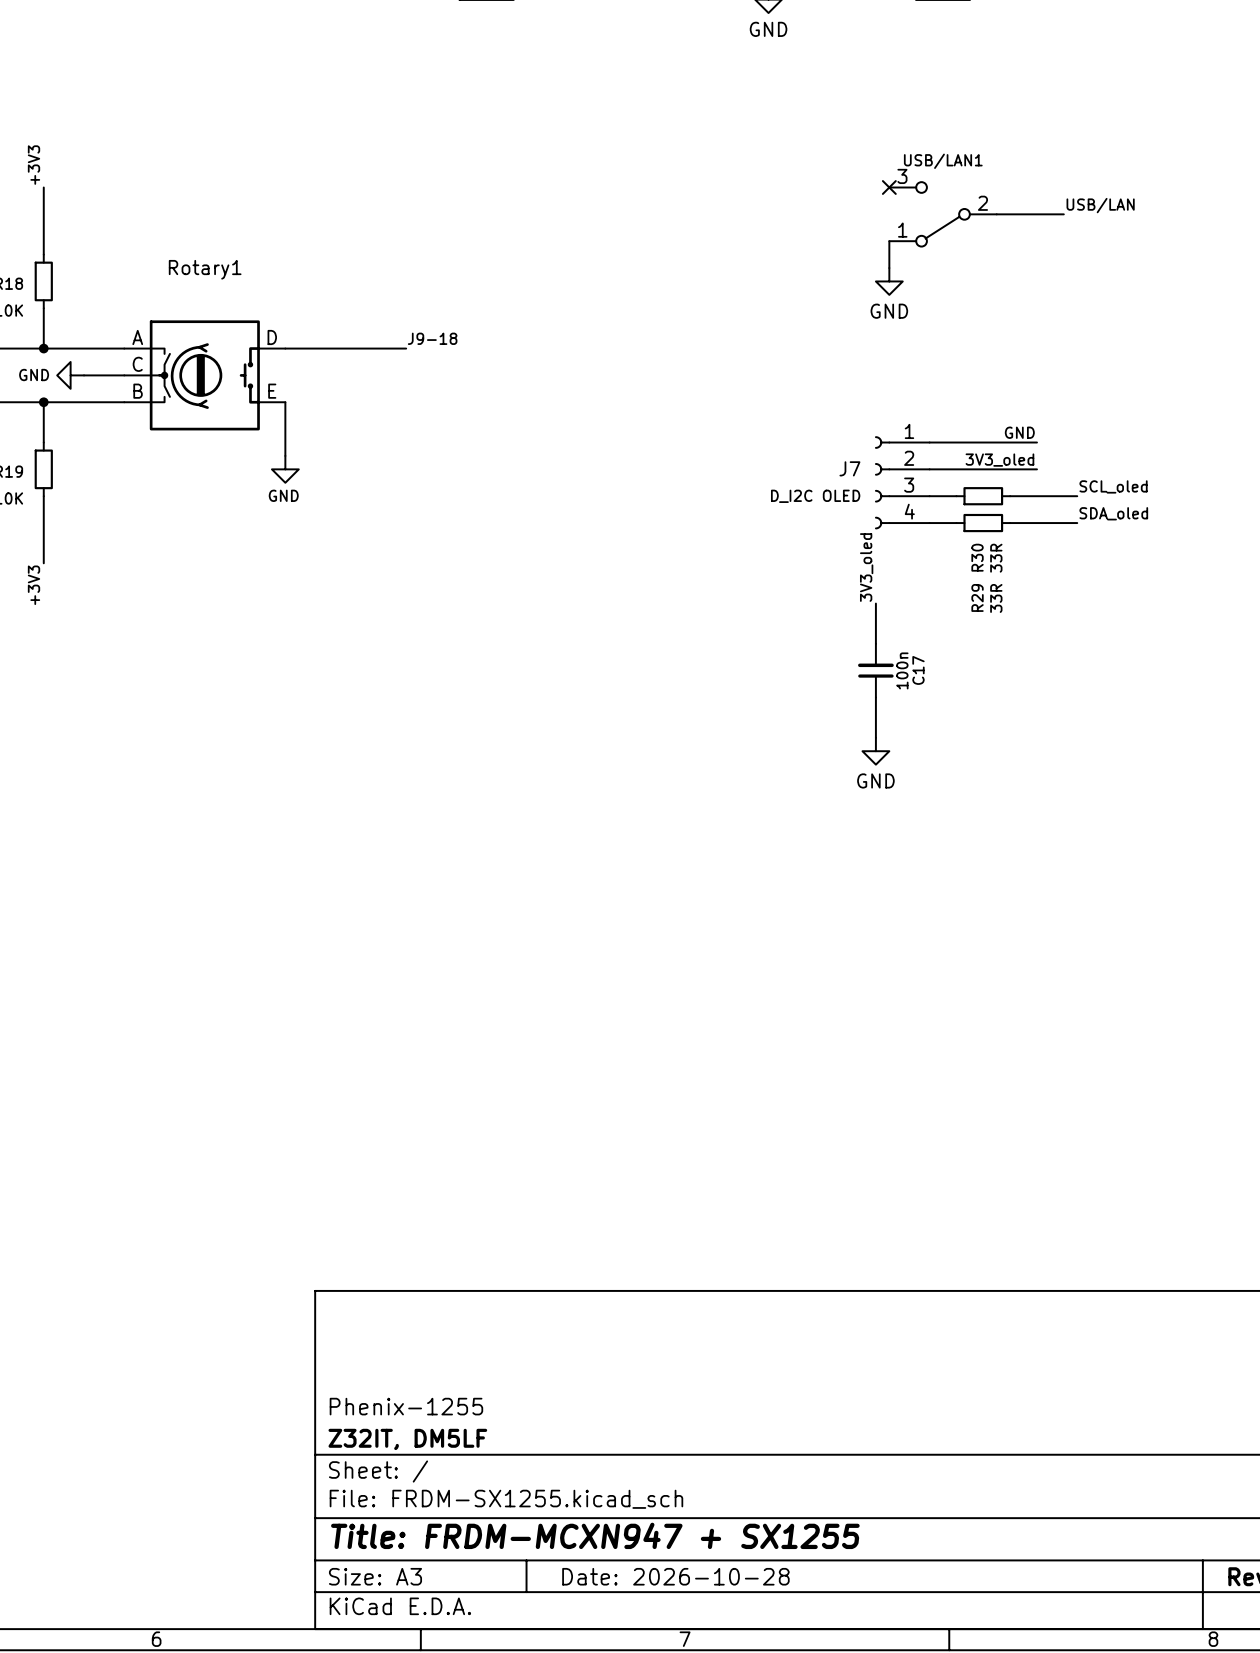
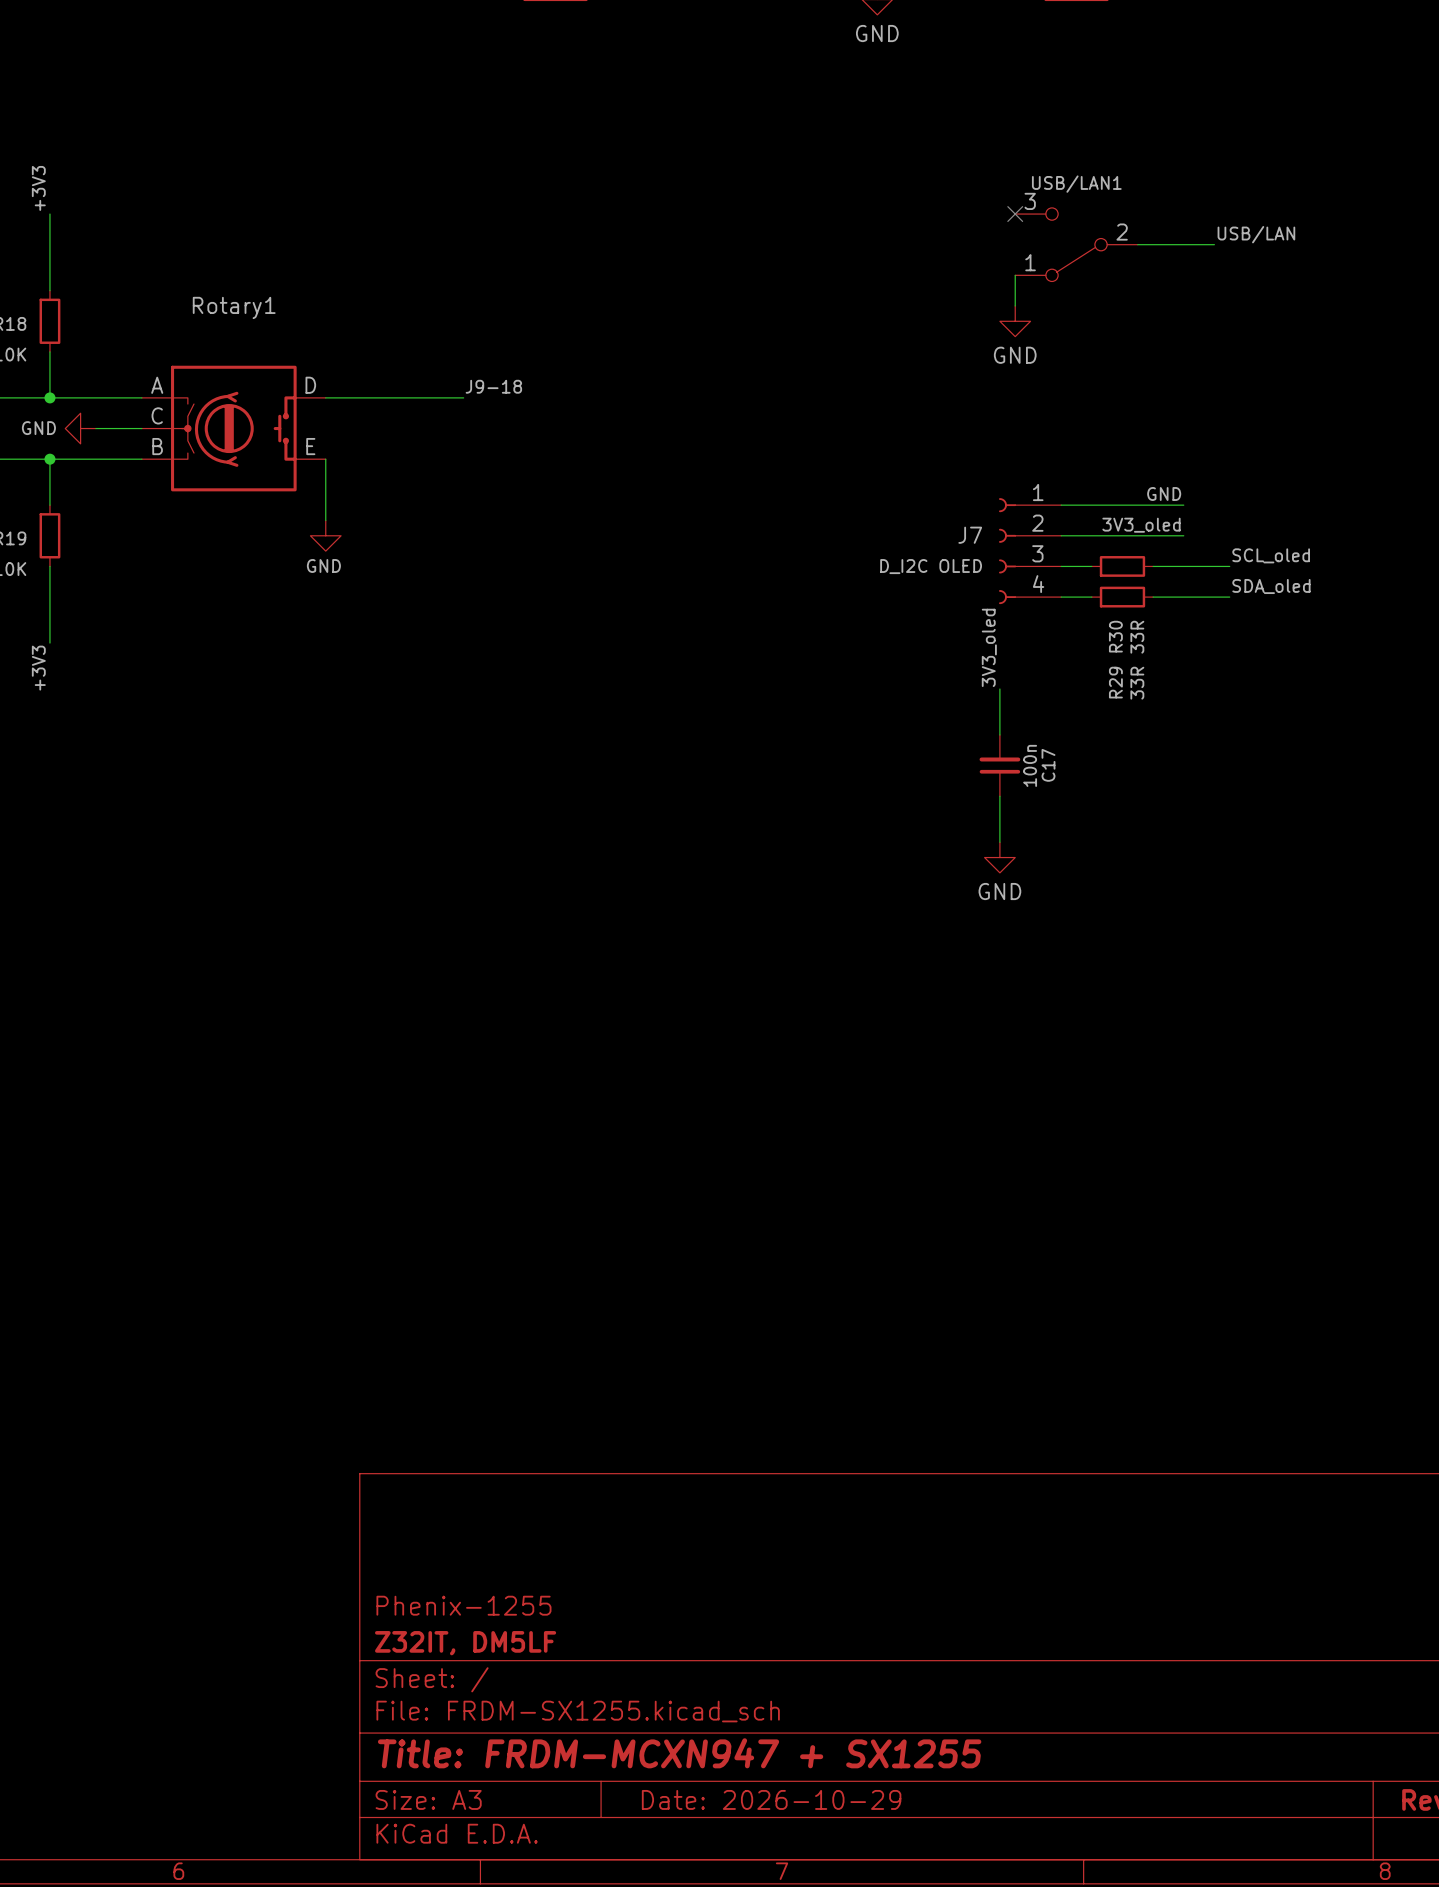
title block: Date: 2026-10-28 (675, 1576) -> Date: 2026-10-29 (771, 1799)

